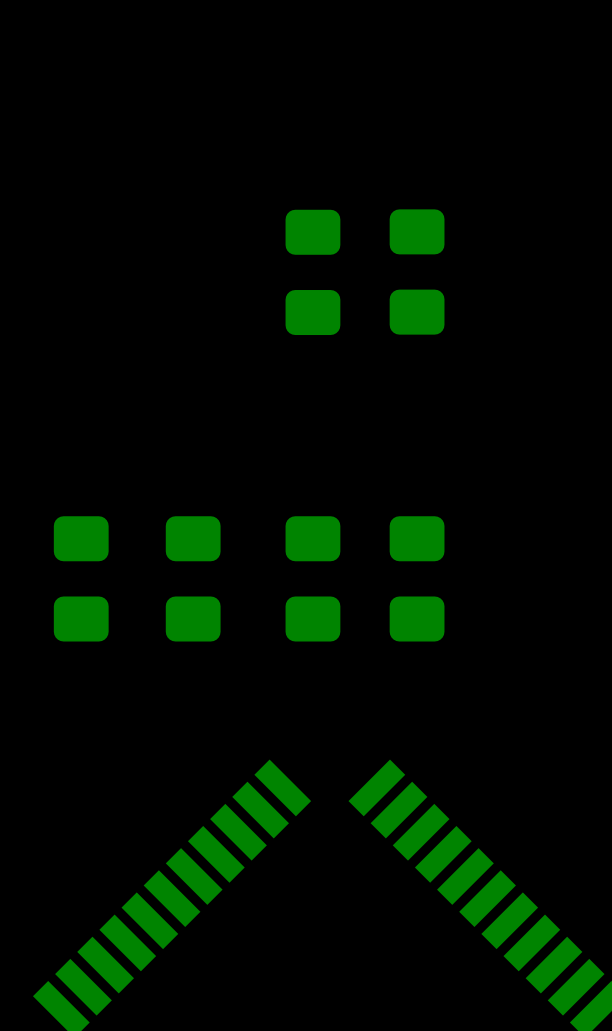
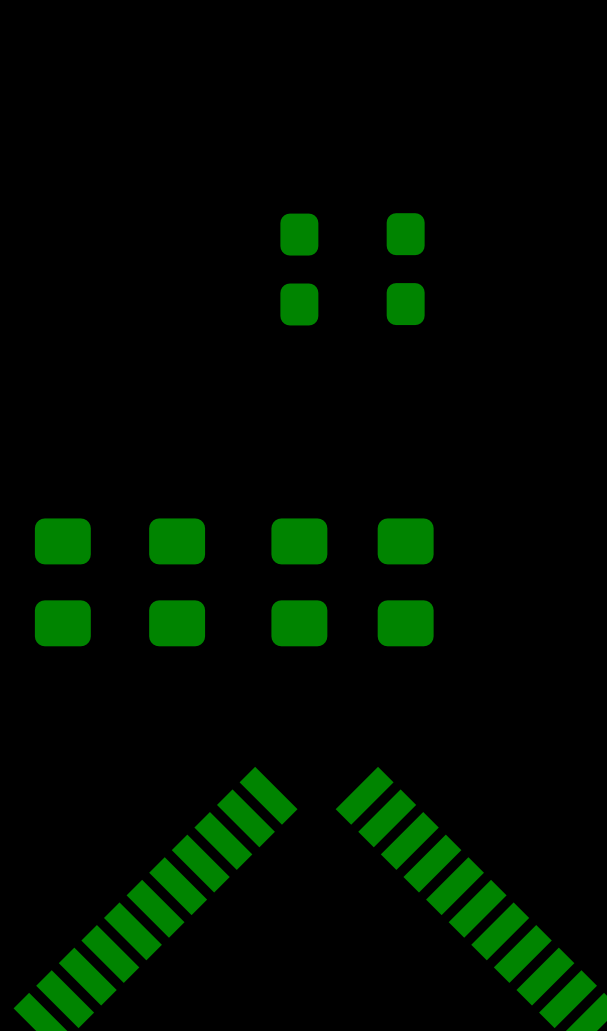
part footprint: [285, 209, 341, 336] -> [280, 213, 319, 326]
part footprint: [389, 209, 445, 335] -> [386, 213, 425, 326]

